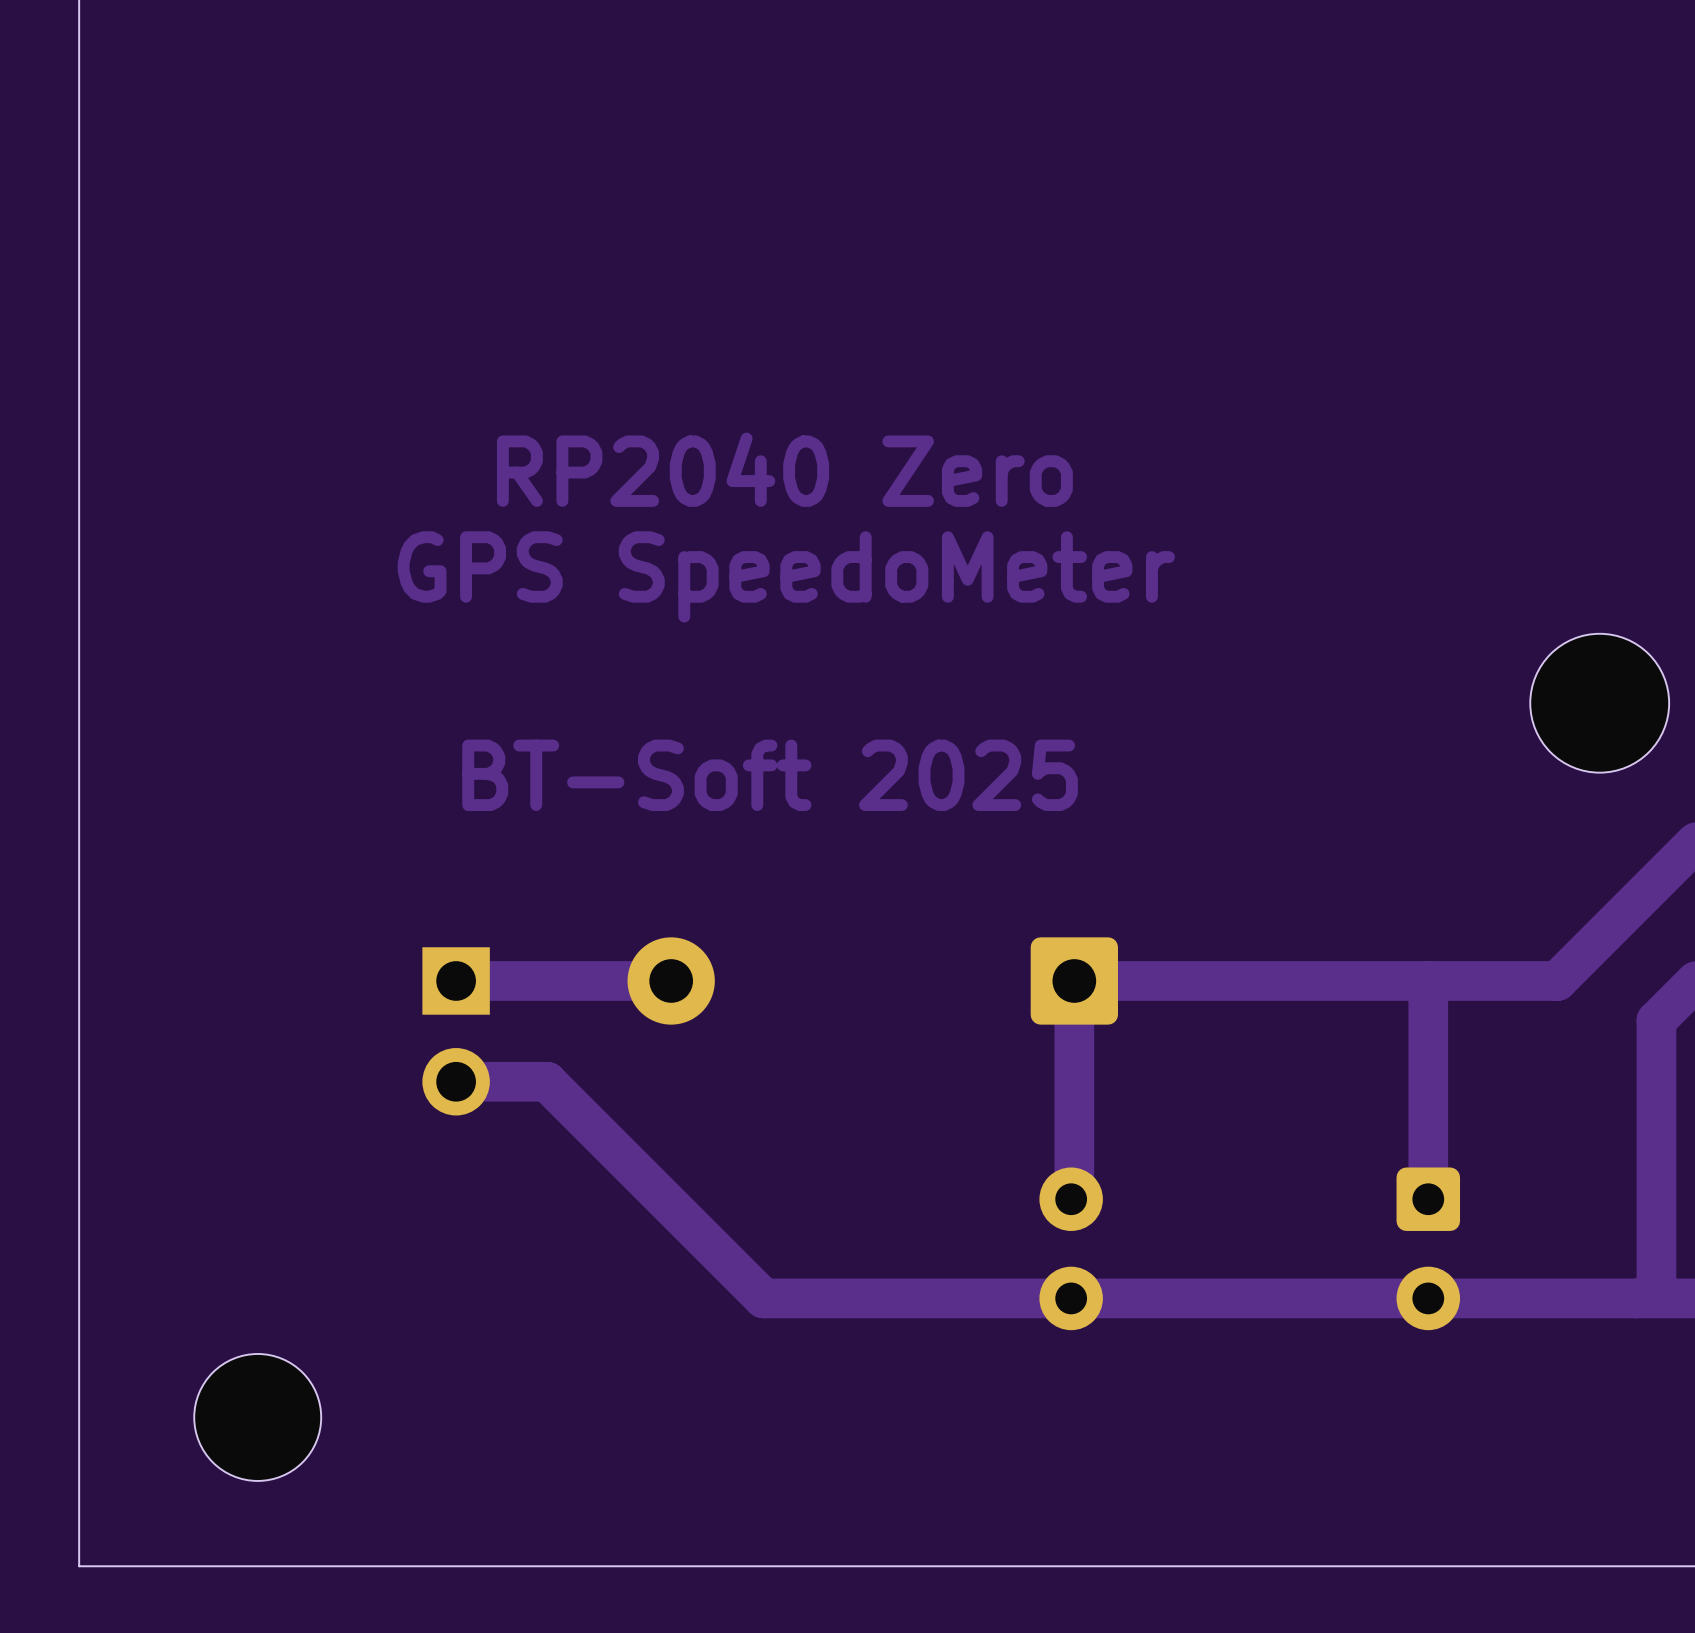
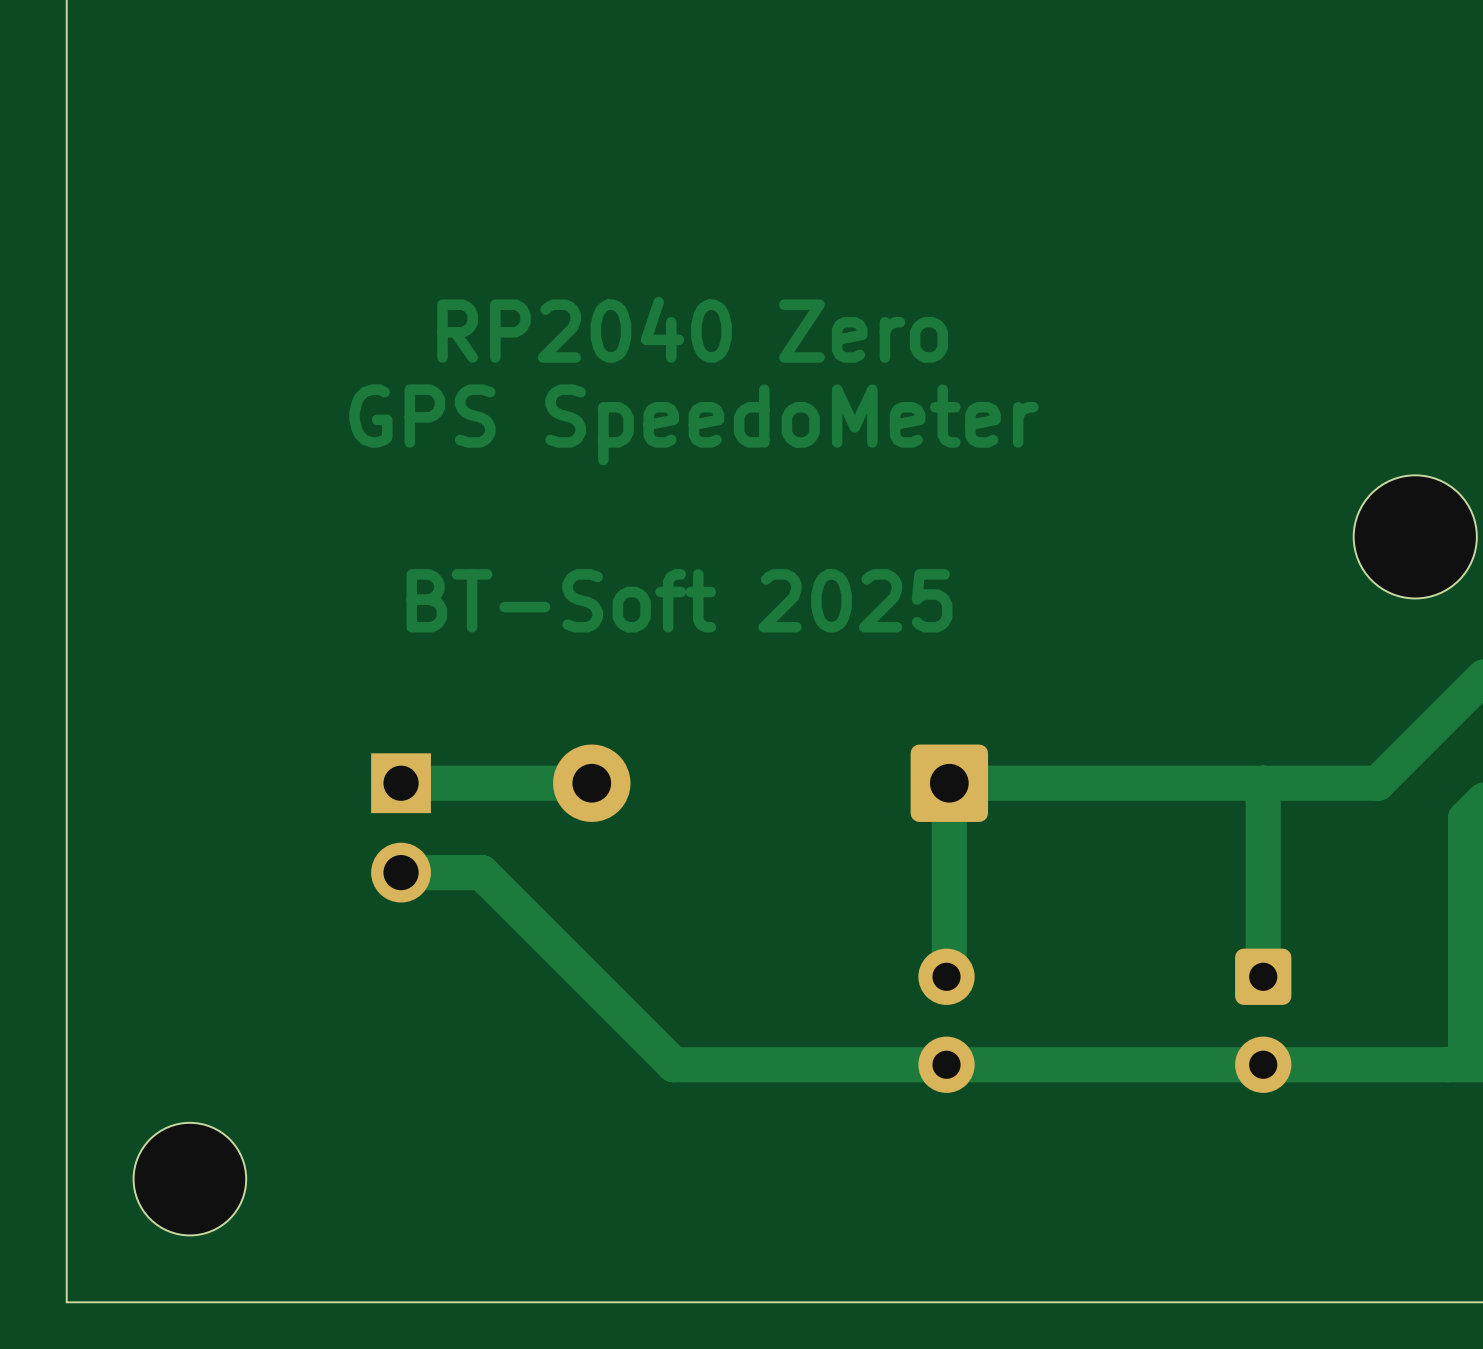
part position: (257, 1417) -> (189, 1179)

